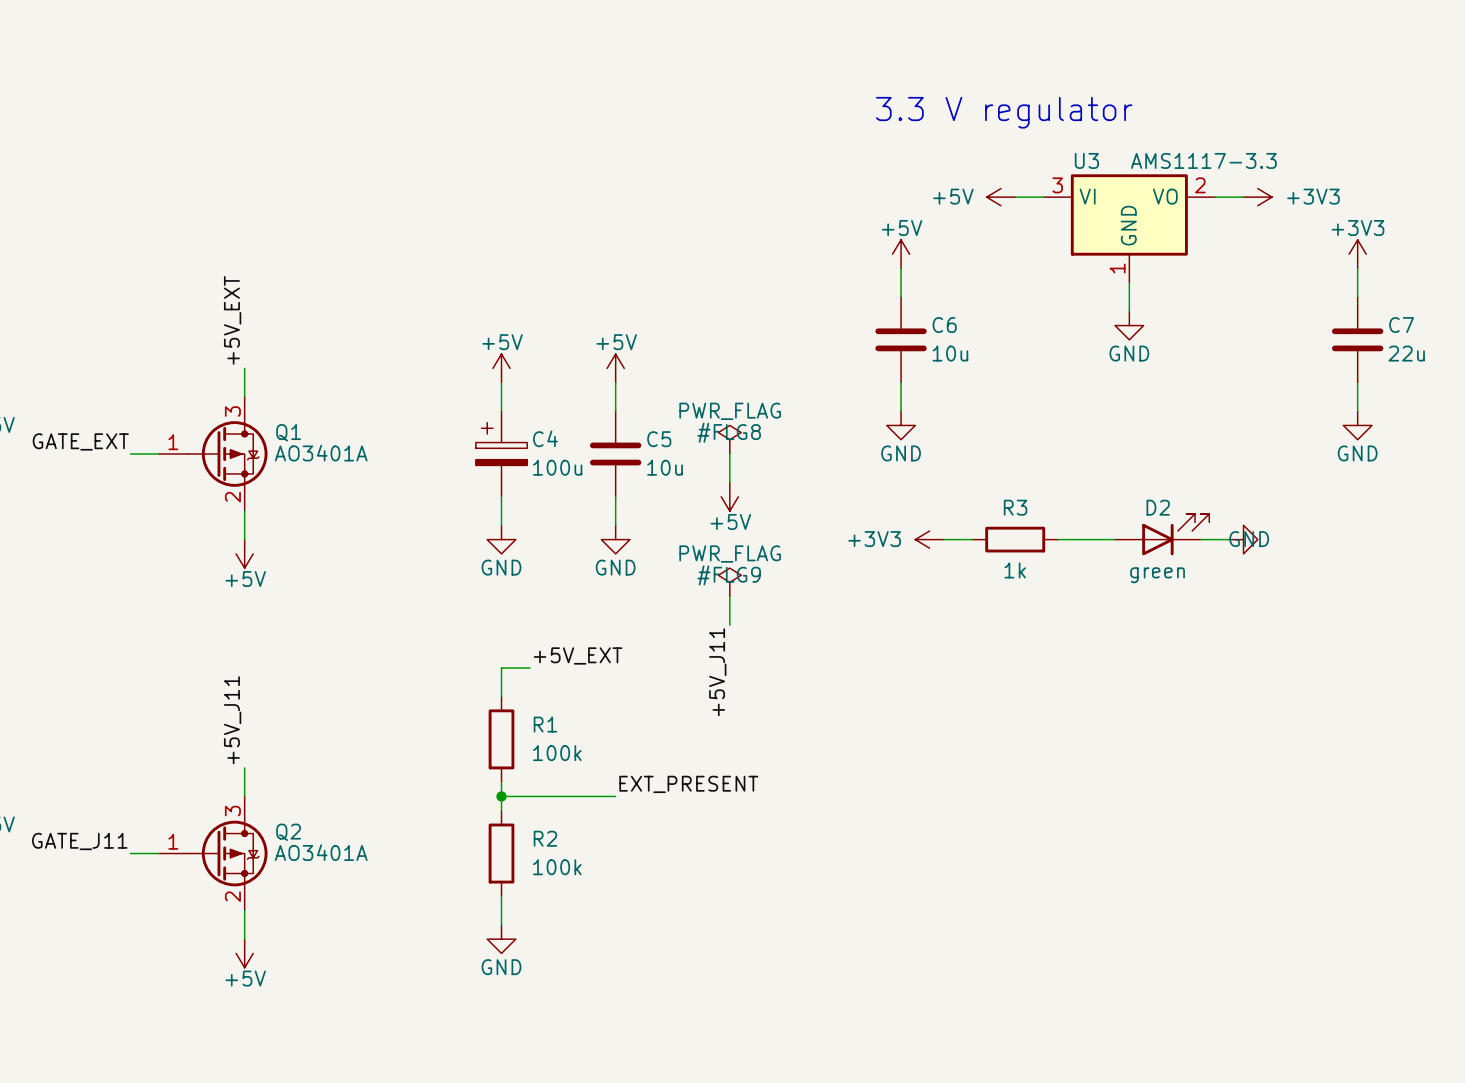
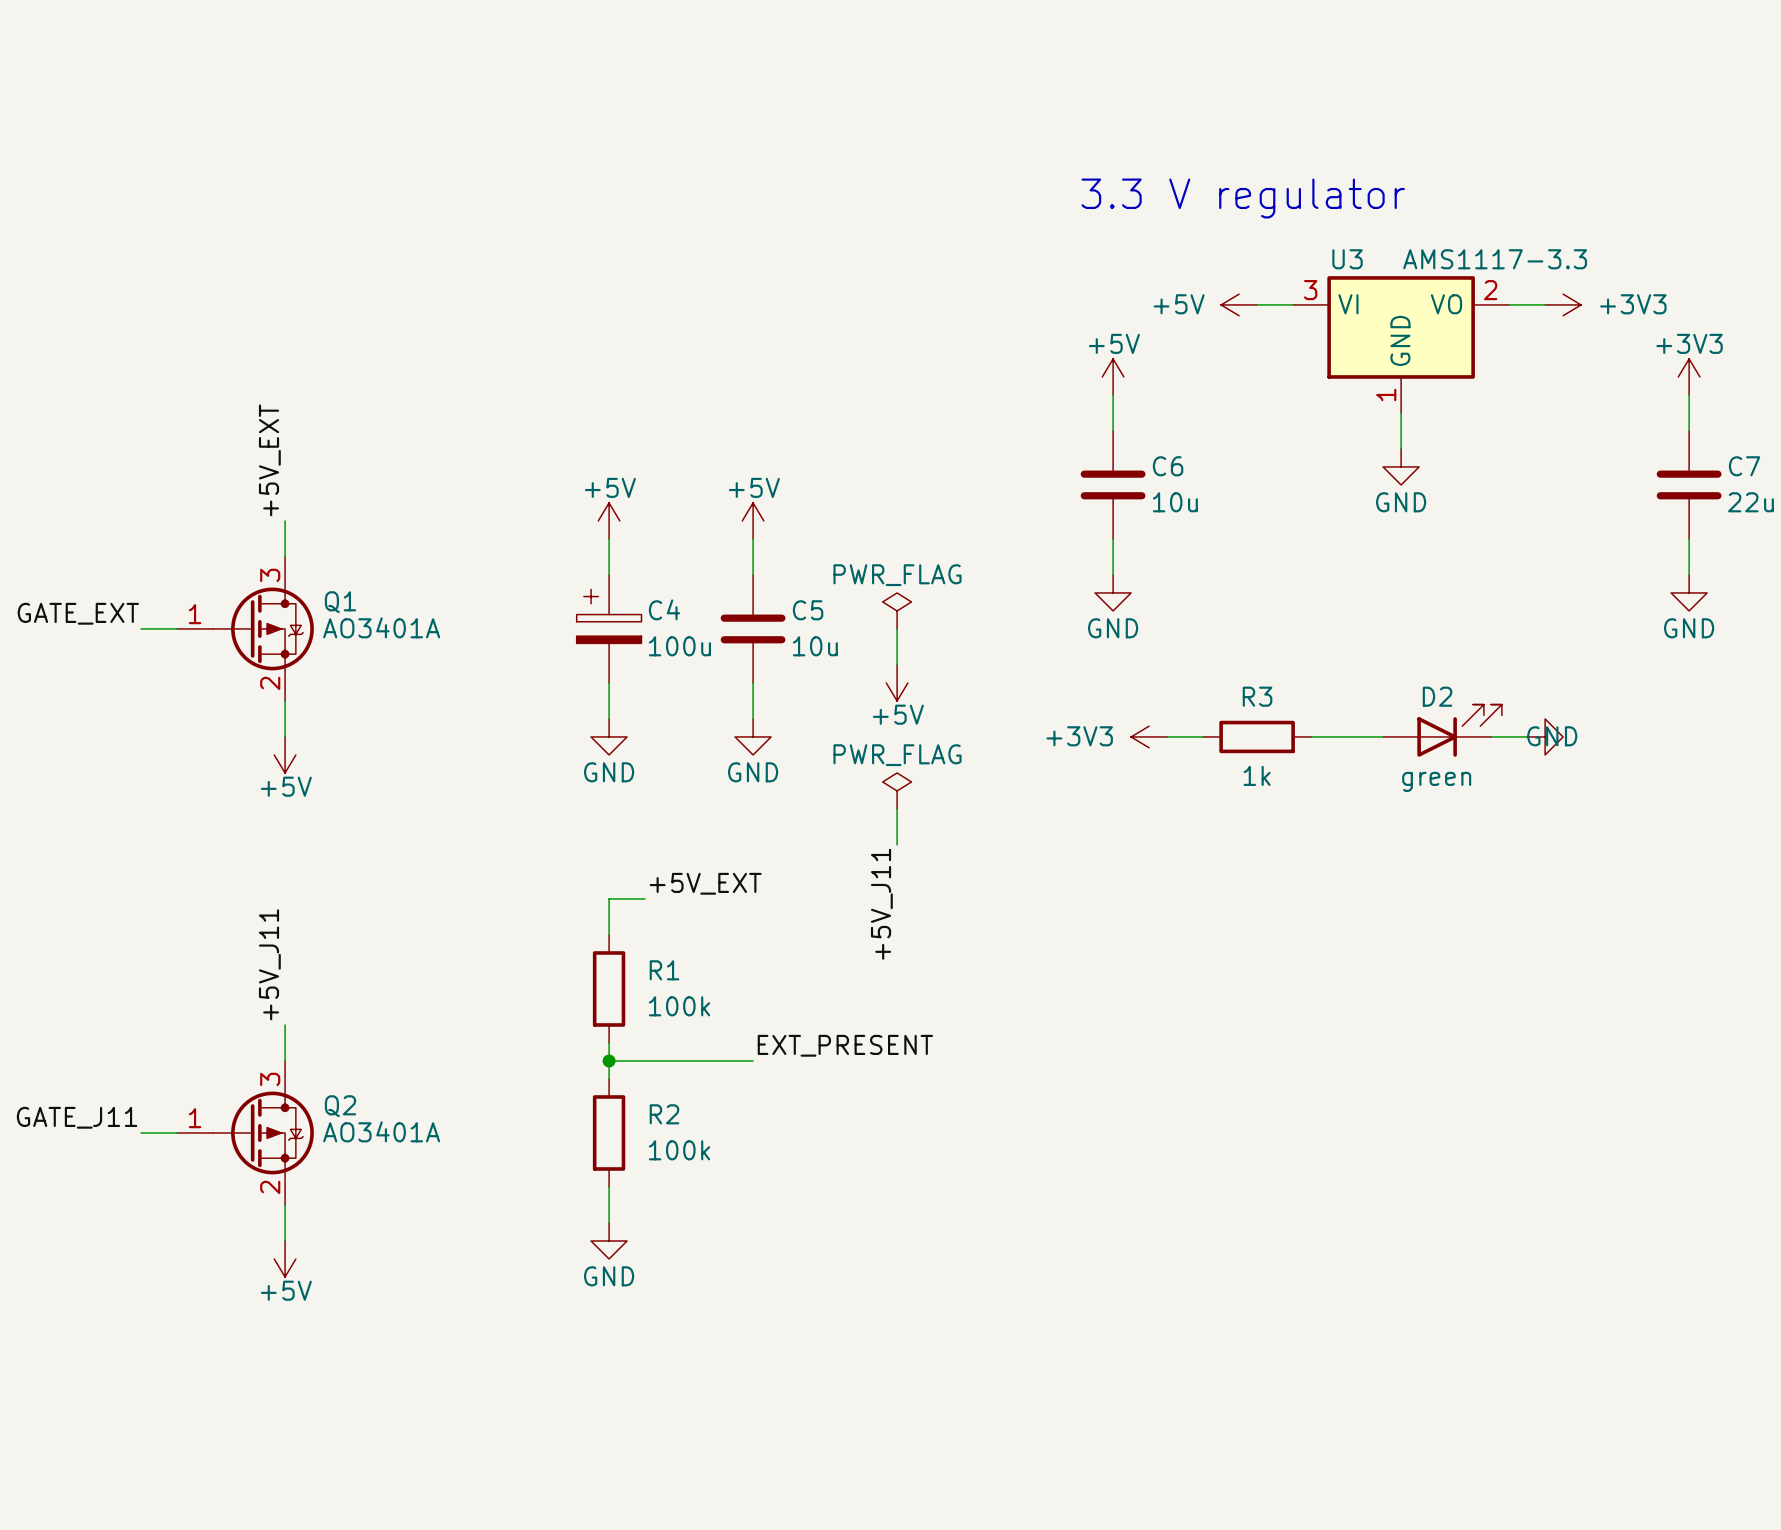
#FLG8 name: #FLG8 (729, 432) -> none
#FLG9 name: #FLG9 (729, 575) -> none

